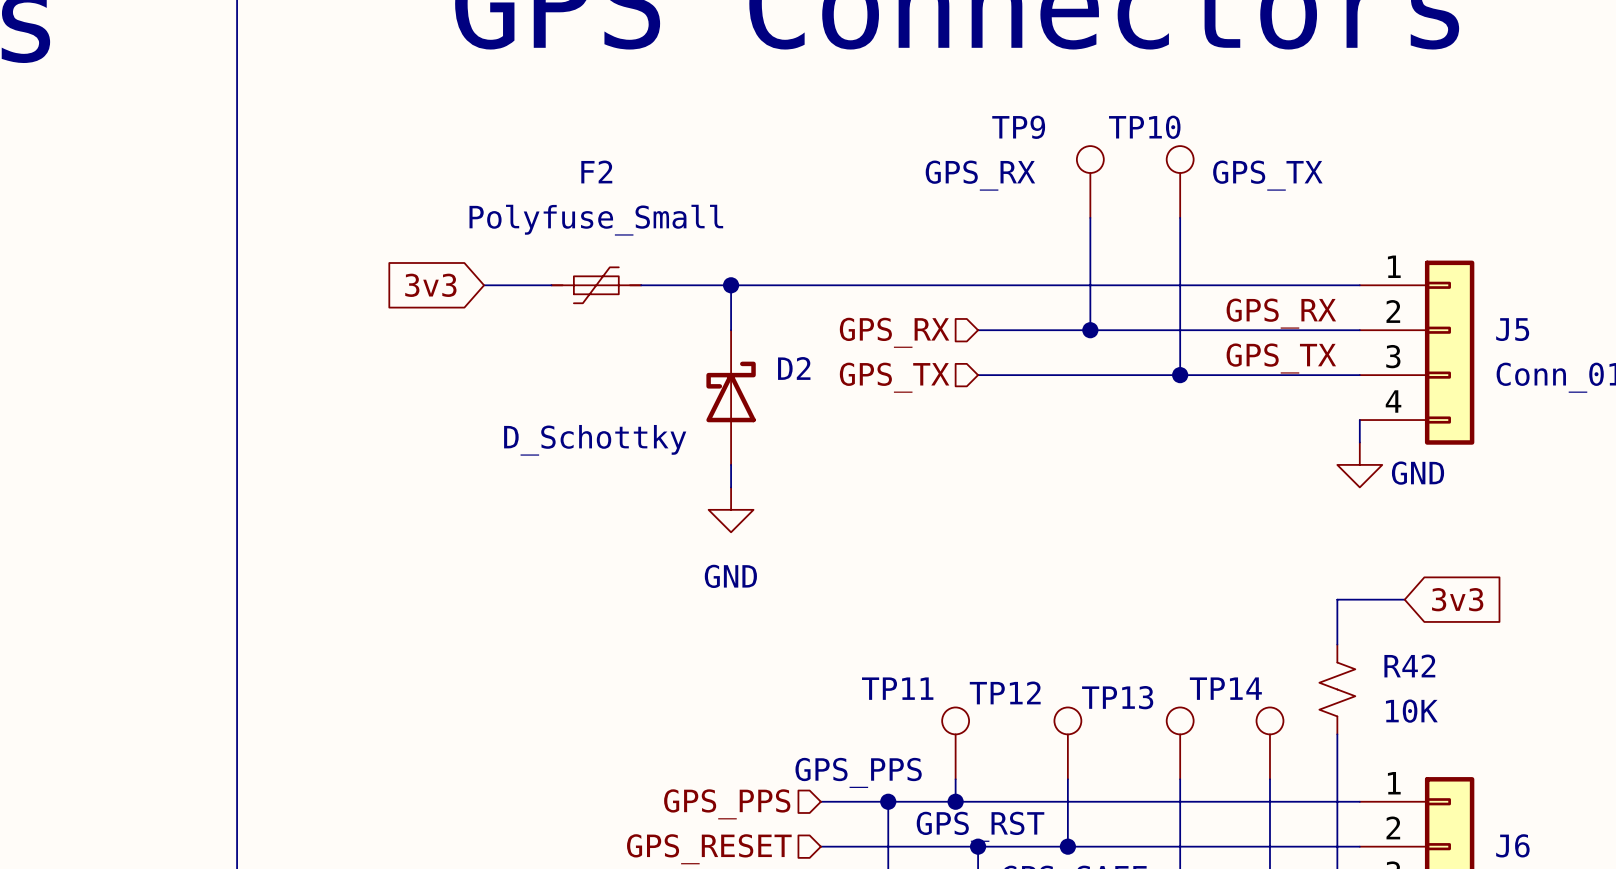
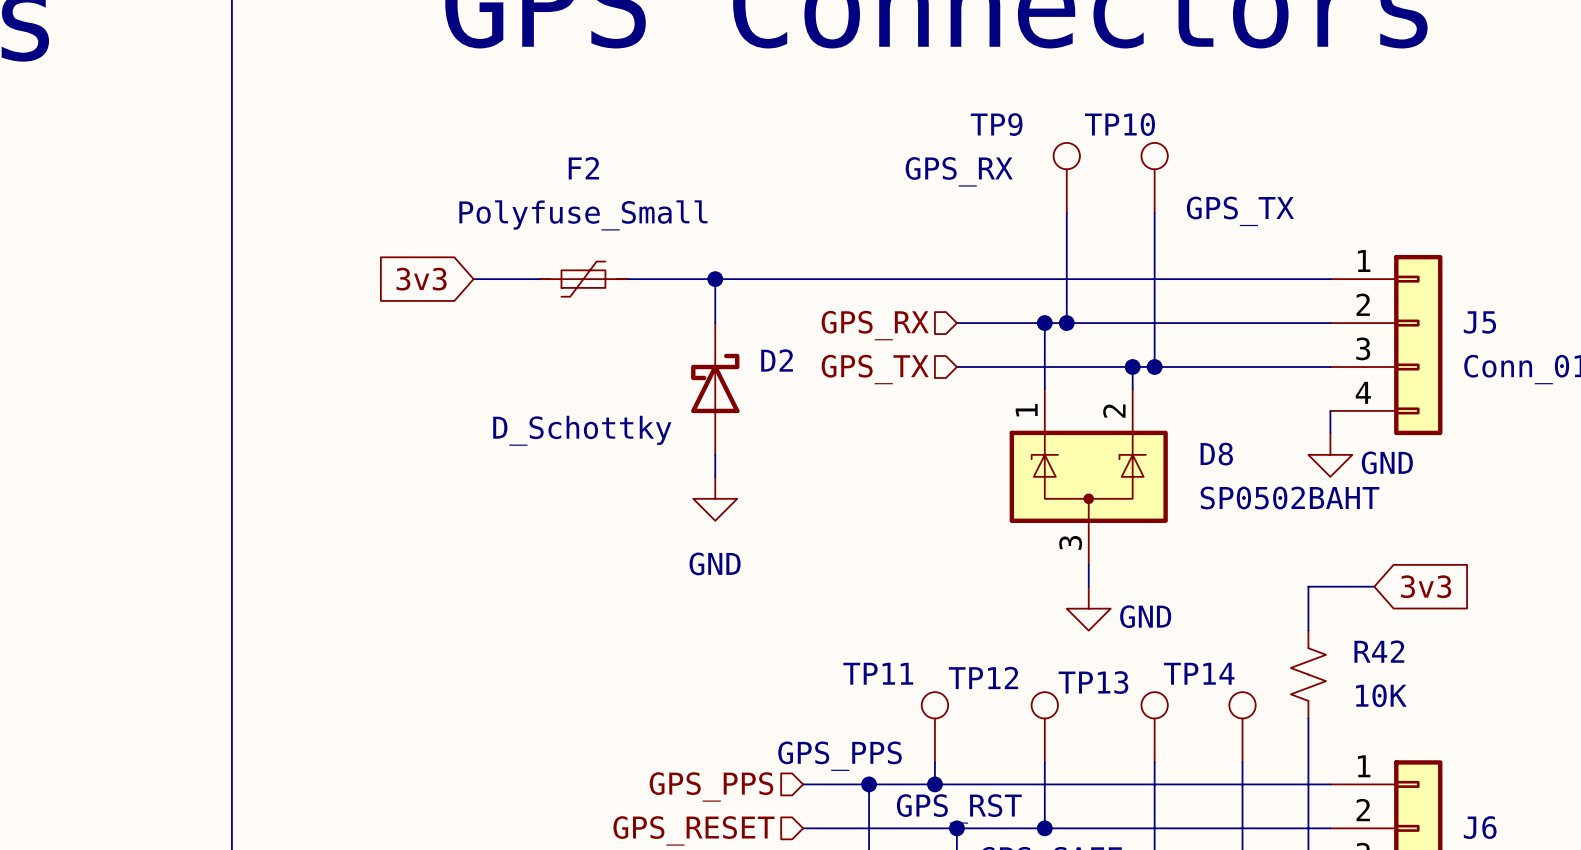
TP10 value position: GPS_TX (1267, 175) -> GPS_TX (1240, 211)
label: GPS_RX (1281, 313) -> none
wire: none -> (1044, 323) (1044, 388)
junction: none -> (1044, 323)
label: GPS_TX (1281, 358) -> none
wire: none -> (1132, 367) (1132, 388)
junction: none -> (1132, 367)
D8: none -> SP0502BAHT (1088, 476)
wire: none -> (1088, 564) (1088, 586)
power symbol: none -> GND (1088, 608)

